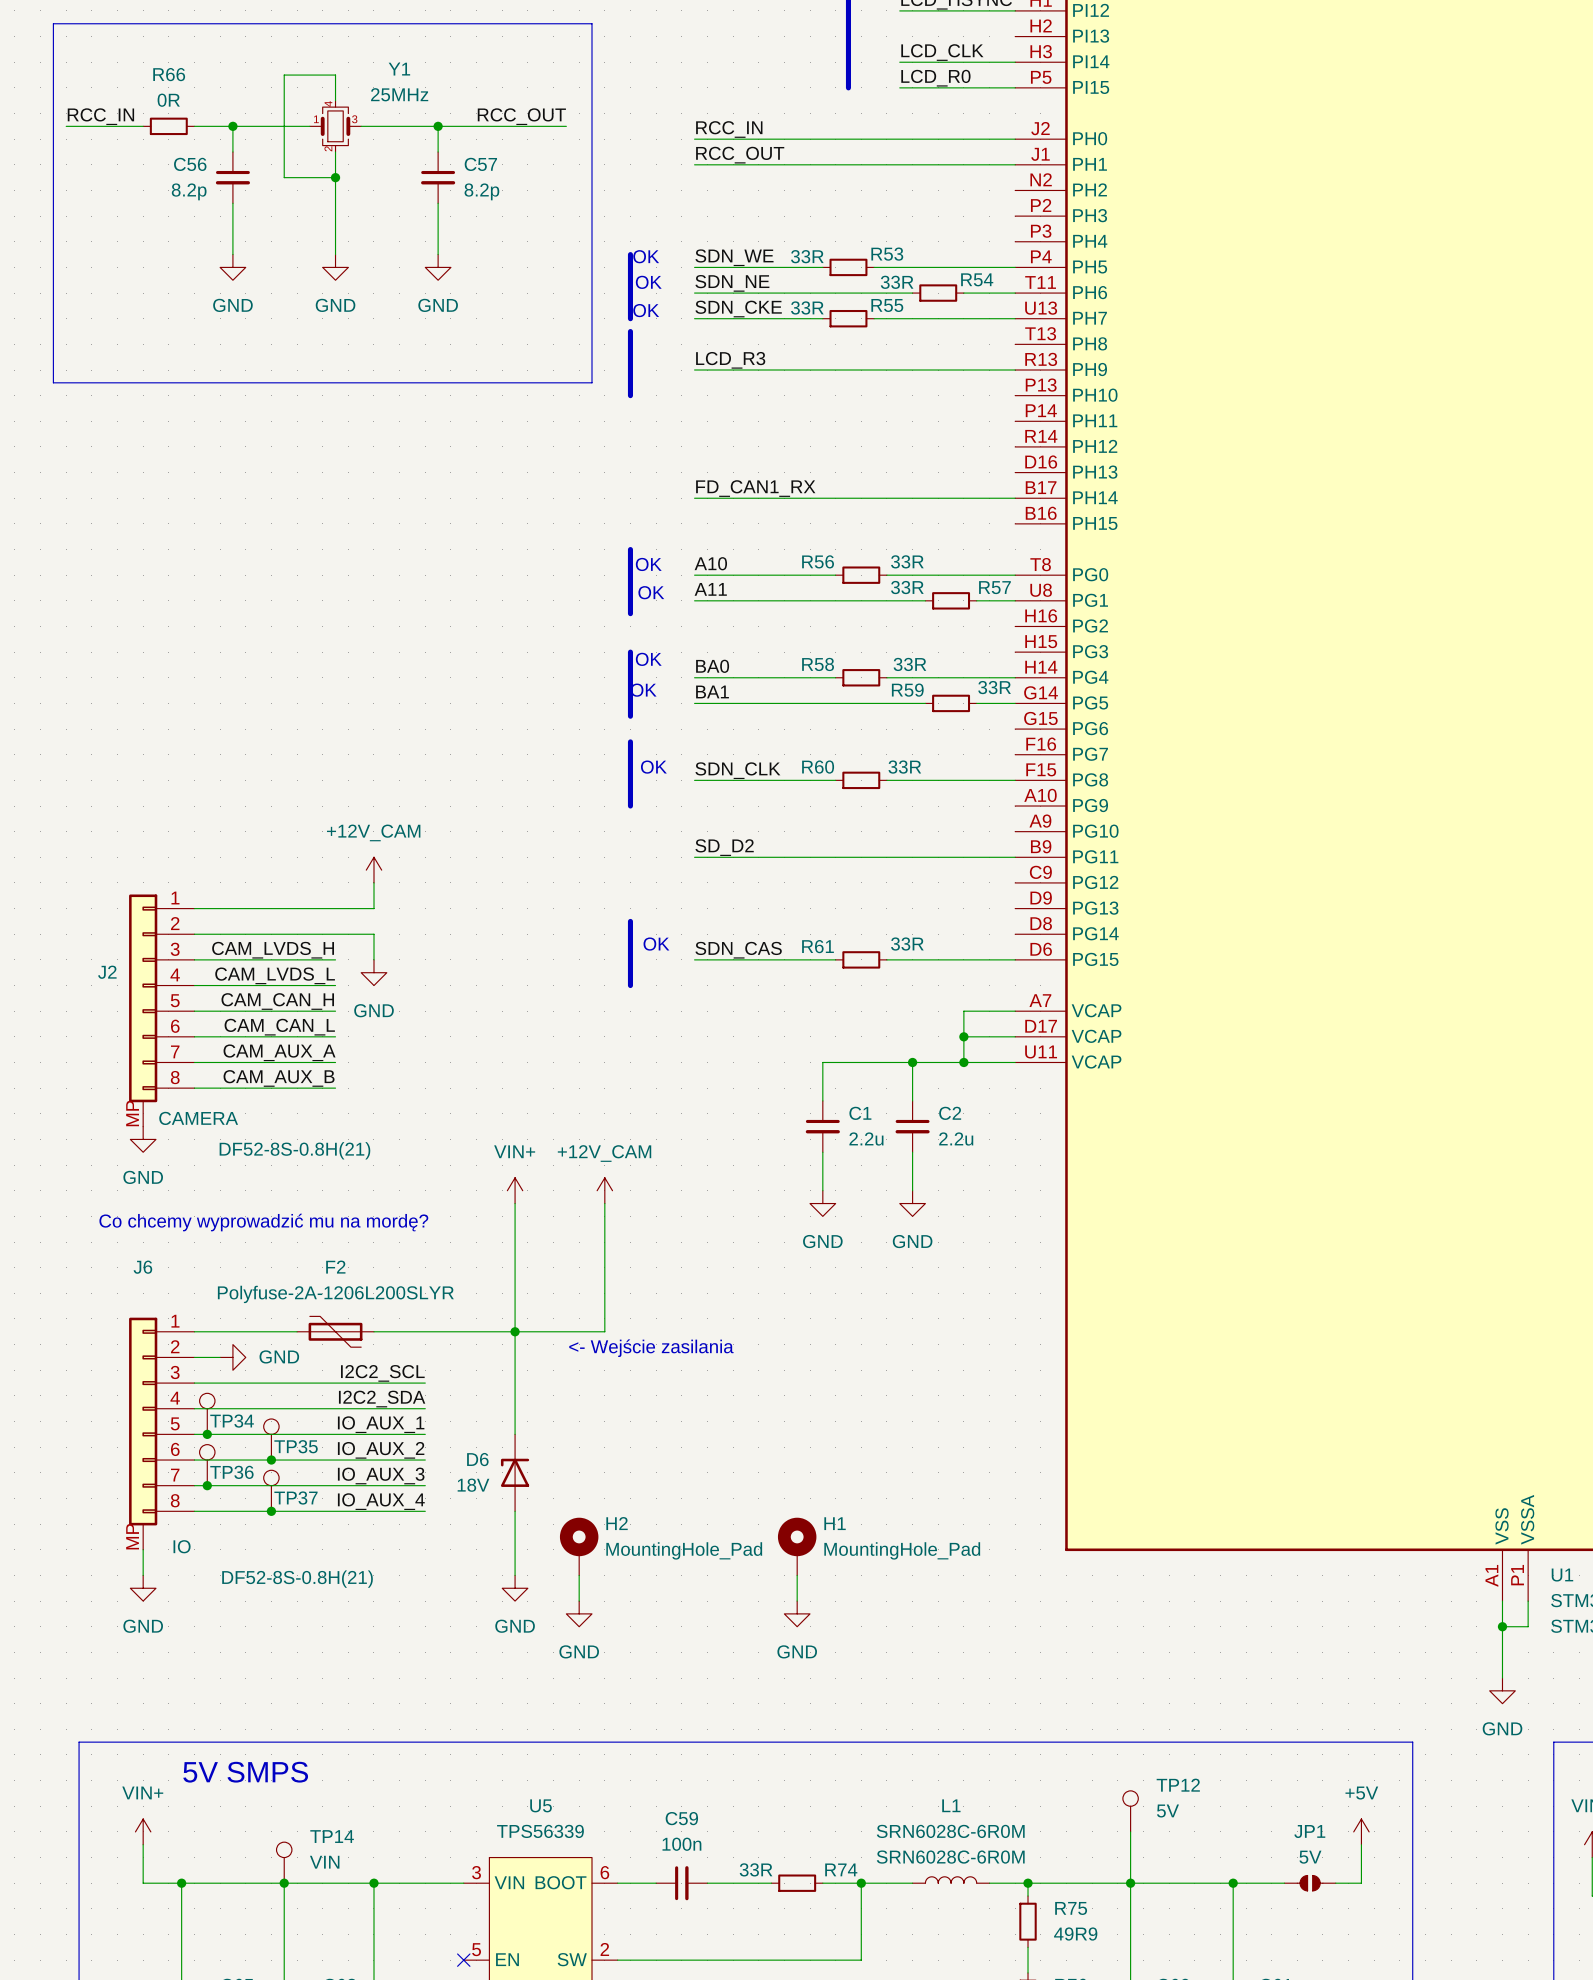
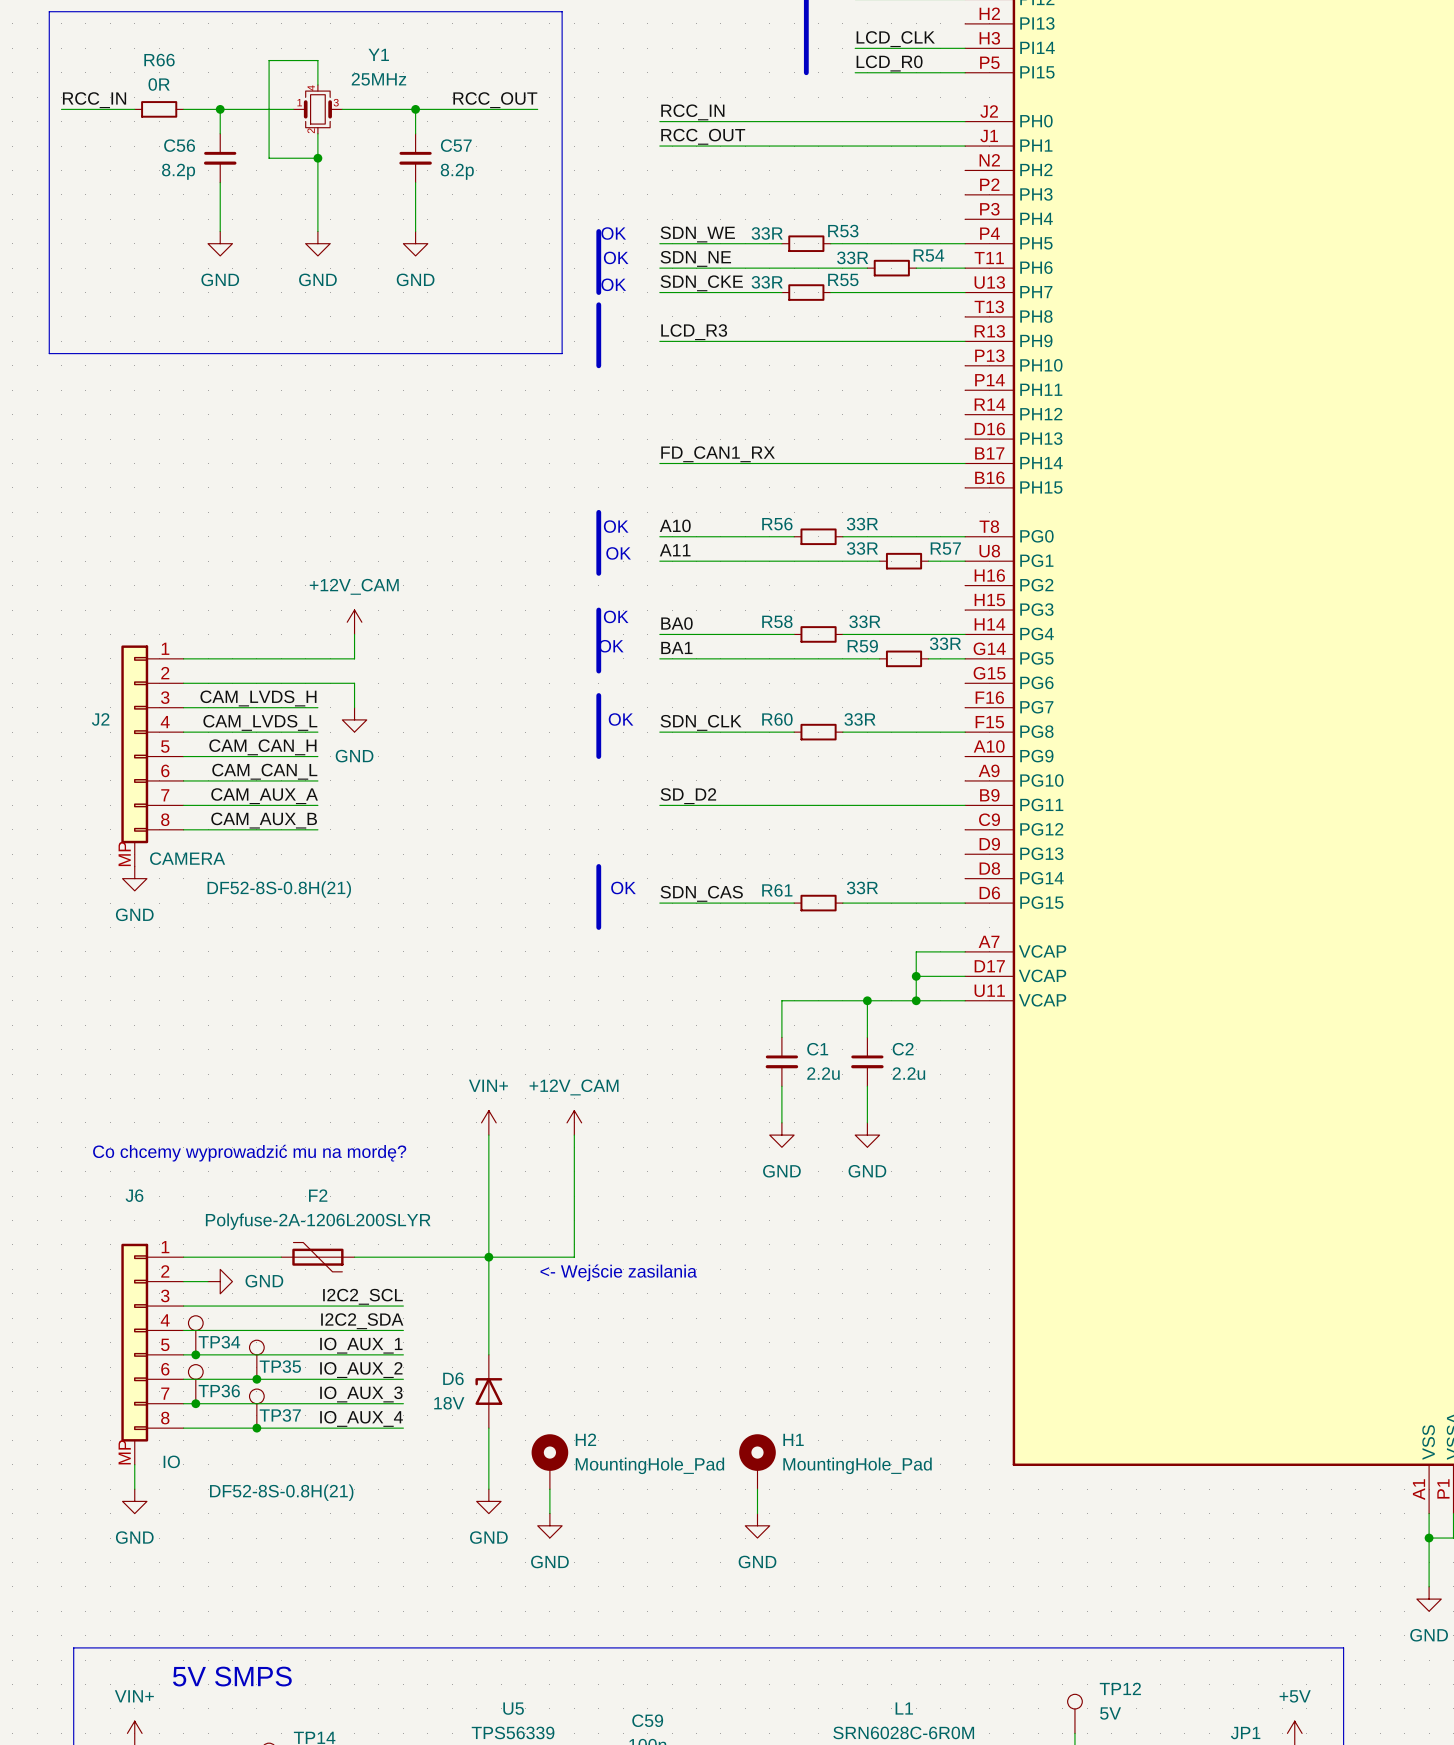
power symbol: none -> GND (354, 719)
power symbol position: +12V_CAM (373, 870) -> +12V_CAM (354, 622)
wire: (373, 882) (373, 908) (194, 908) -> (354, 634) (354, 658) (183, 658)
power symbol: none -> GND (134, 878)
wire: (194, 934) (373, 934) (373, 959) -> (183, 683) (354, 683) (354, 707)
label position: CAM_LVDS_H (273, 950) -> CAM_LVDS_H (258, 698)
wire: (194, 959) (335, 959) -> (183, 707) (317, 707)
power symbol: GND (373, 972) -> none
label position: CAM_LVDS_L (275, 975) -> CAM_LVDS_L (260, 722)
wire: (194, 985) (335, 985) -> (183, 732) (317, 732)
label position: CAM_CAN_H (277, 1001) -> CAM_CAN_H (262, 747)
J2 position: (161, 1010) -> (152, 755)
wire: (194, 1011) (335, 1011) -> (183, 756) (317, 756)
label position: CAM_CAN_L (279, 1027) -> CAM_CAN_L (264, 771)
wire: (194, 1036) (335, 1036) -> (183, 780) (317, 780)
label position: CAM_AUX_A (279, 1052) -> CAM_AUX_A (264, 796)
wire: (194, 1062) (335, 1062) -> (183, 805) (317, 805)
label position: CAM_AUX_B (279, 1078) -> CAM_AUX_B (264, 820)
wire: (194, 1088) (335, 1088) -> (183, 829) (317, 829)
power symbol: GND (143, 1139) -> none

